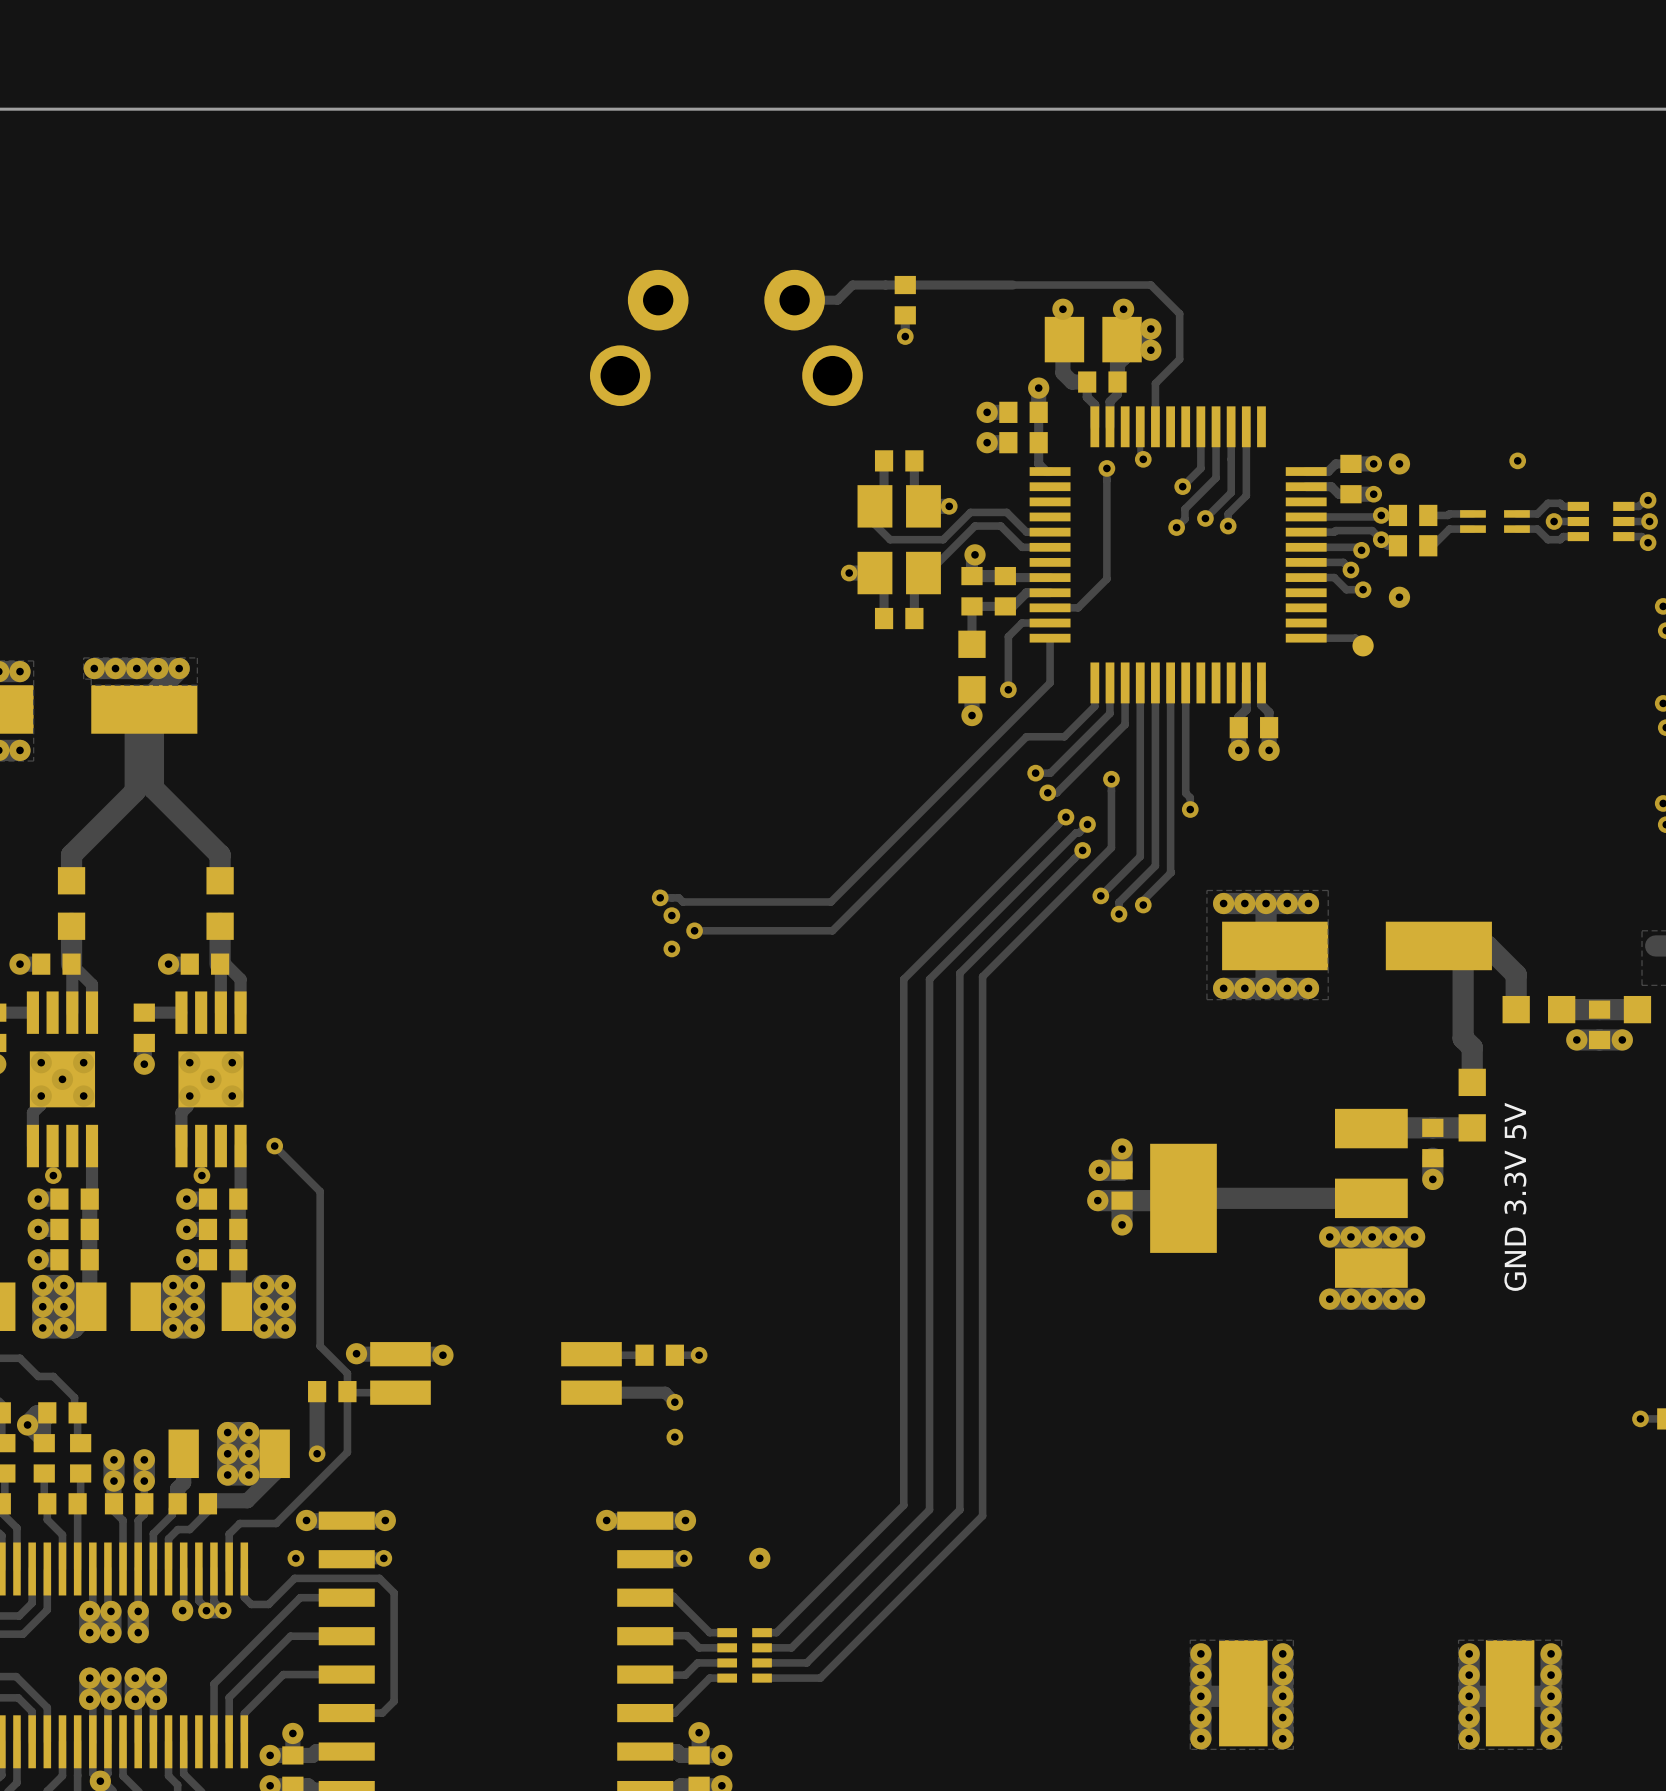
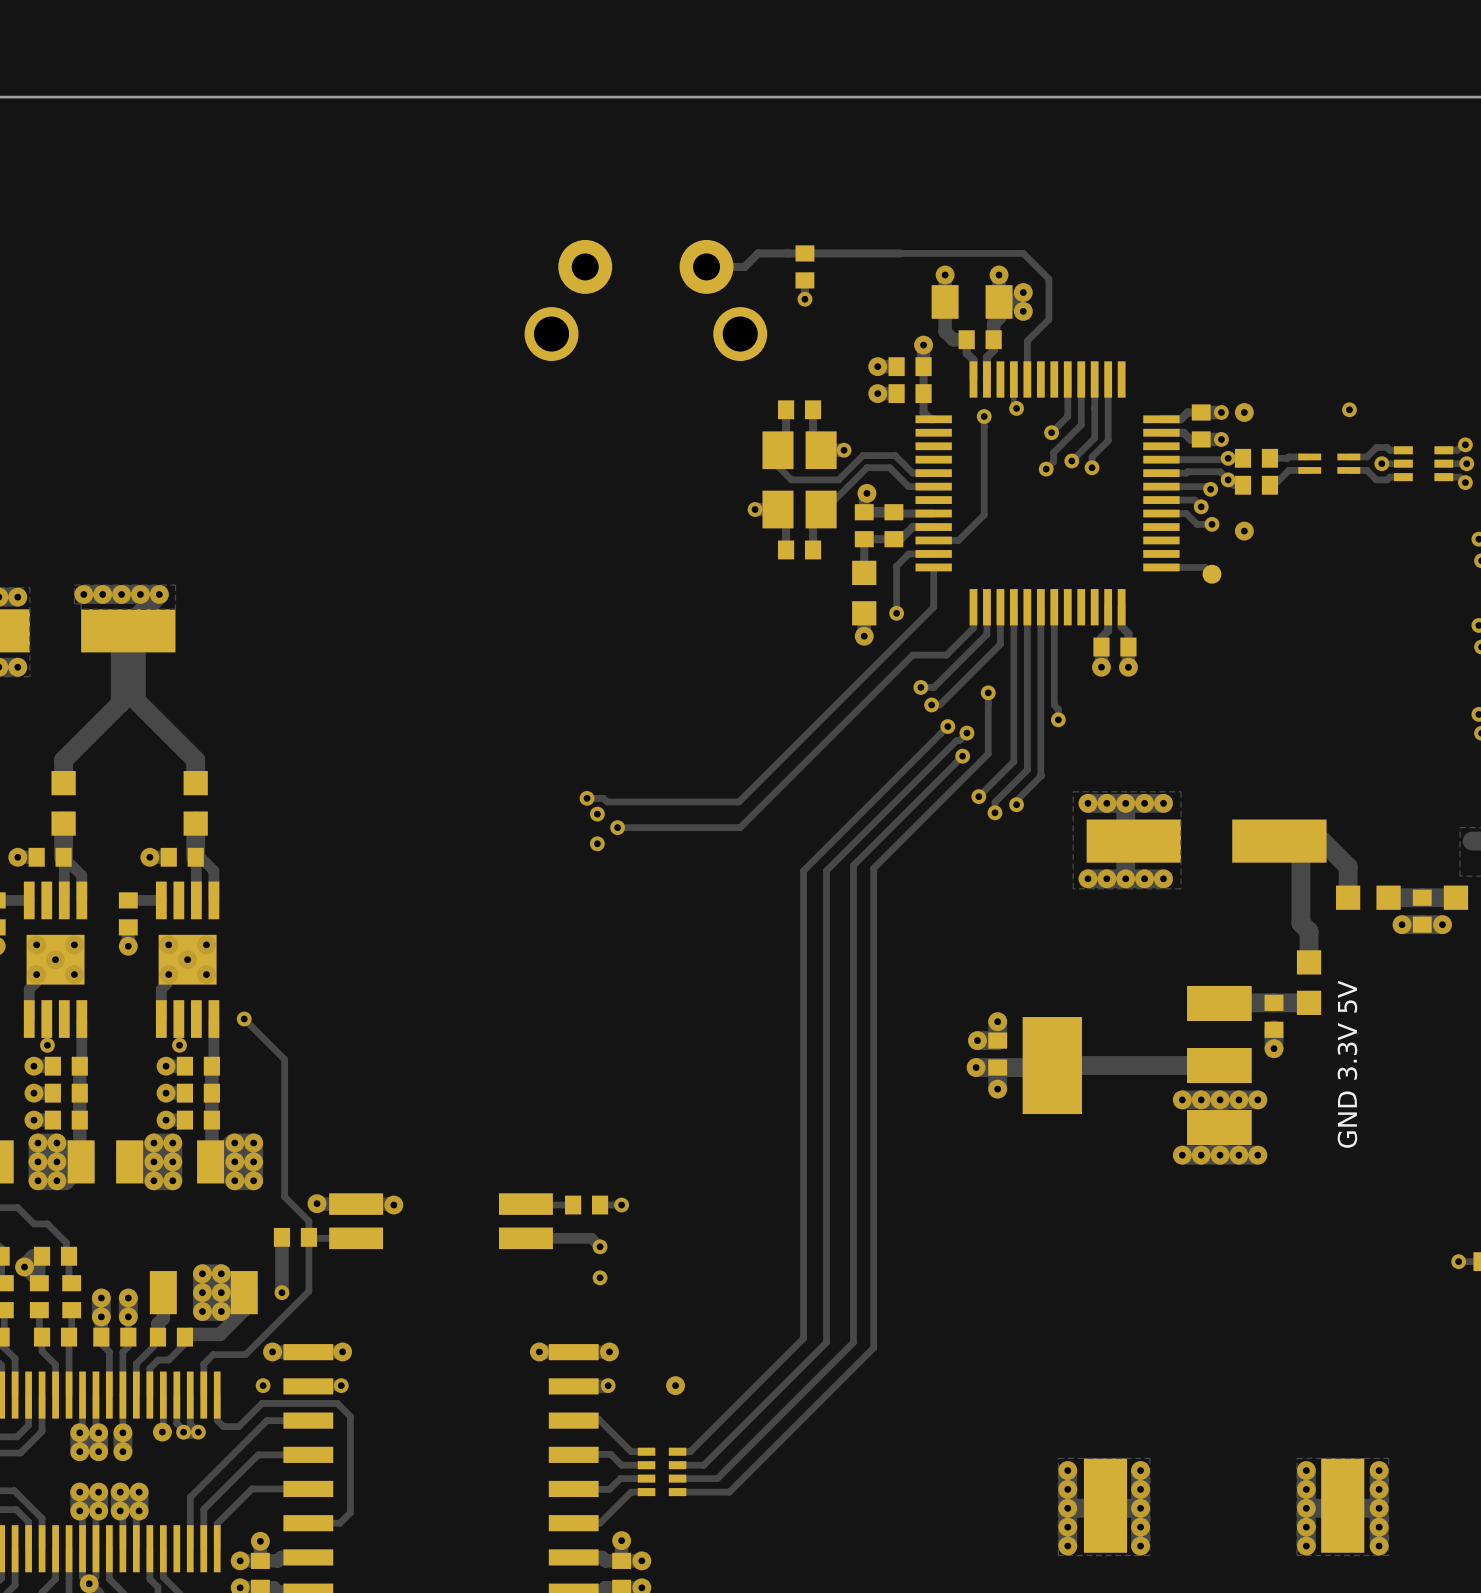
part footprint: [1044, 316, 1142, 363] -> [931, 285, 1013, 319]

